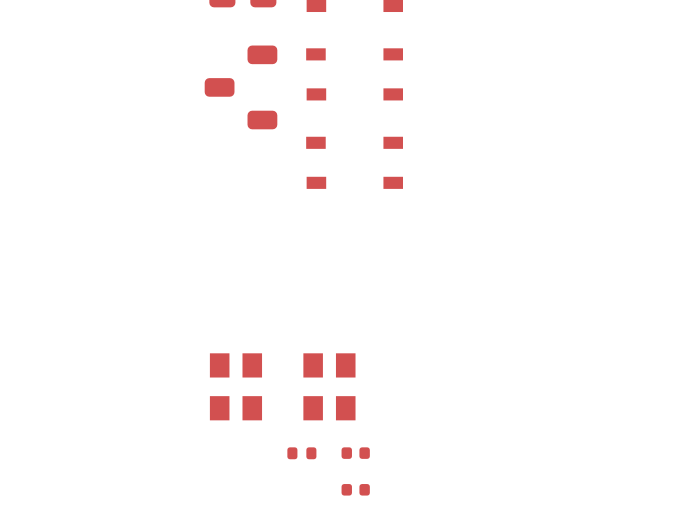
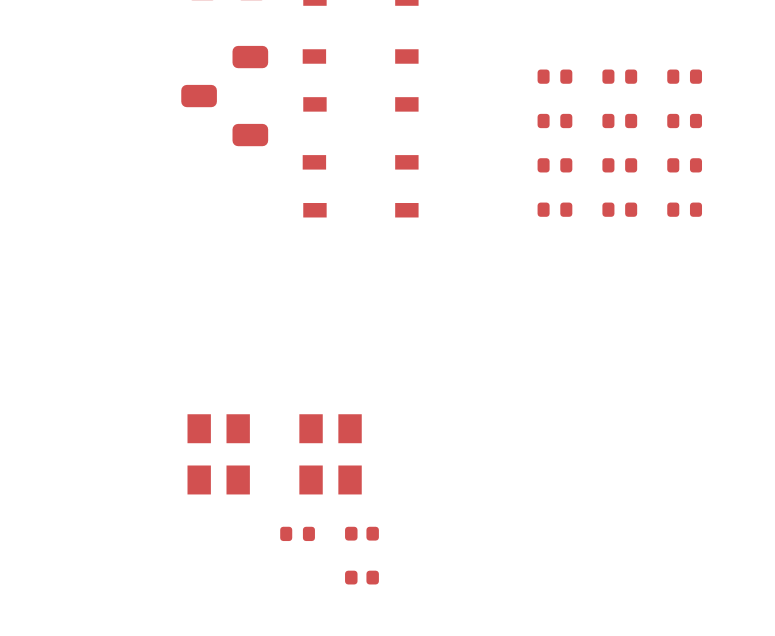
part: none -> (554, 76)
part: none -> (619, 76)
part: none -> (684, 76)
part: none -> (554, 121)
part: none -> (619, 121)
part: none -> (684, 121)
part: none -> (554, 165)
part: none -> (619, 165)
part: none -> (684, 165)
part: none -> (554, 209)
part: none -> (619, 209)
part: none -> (684, 209)

